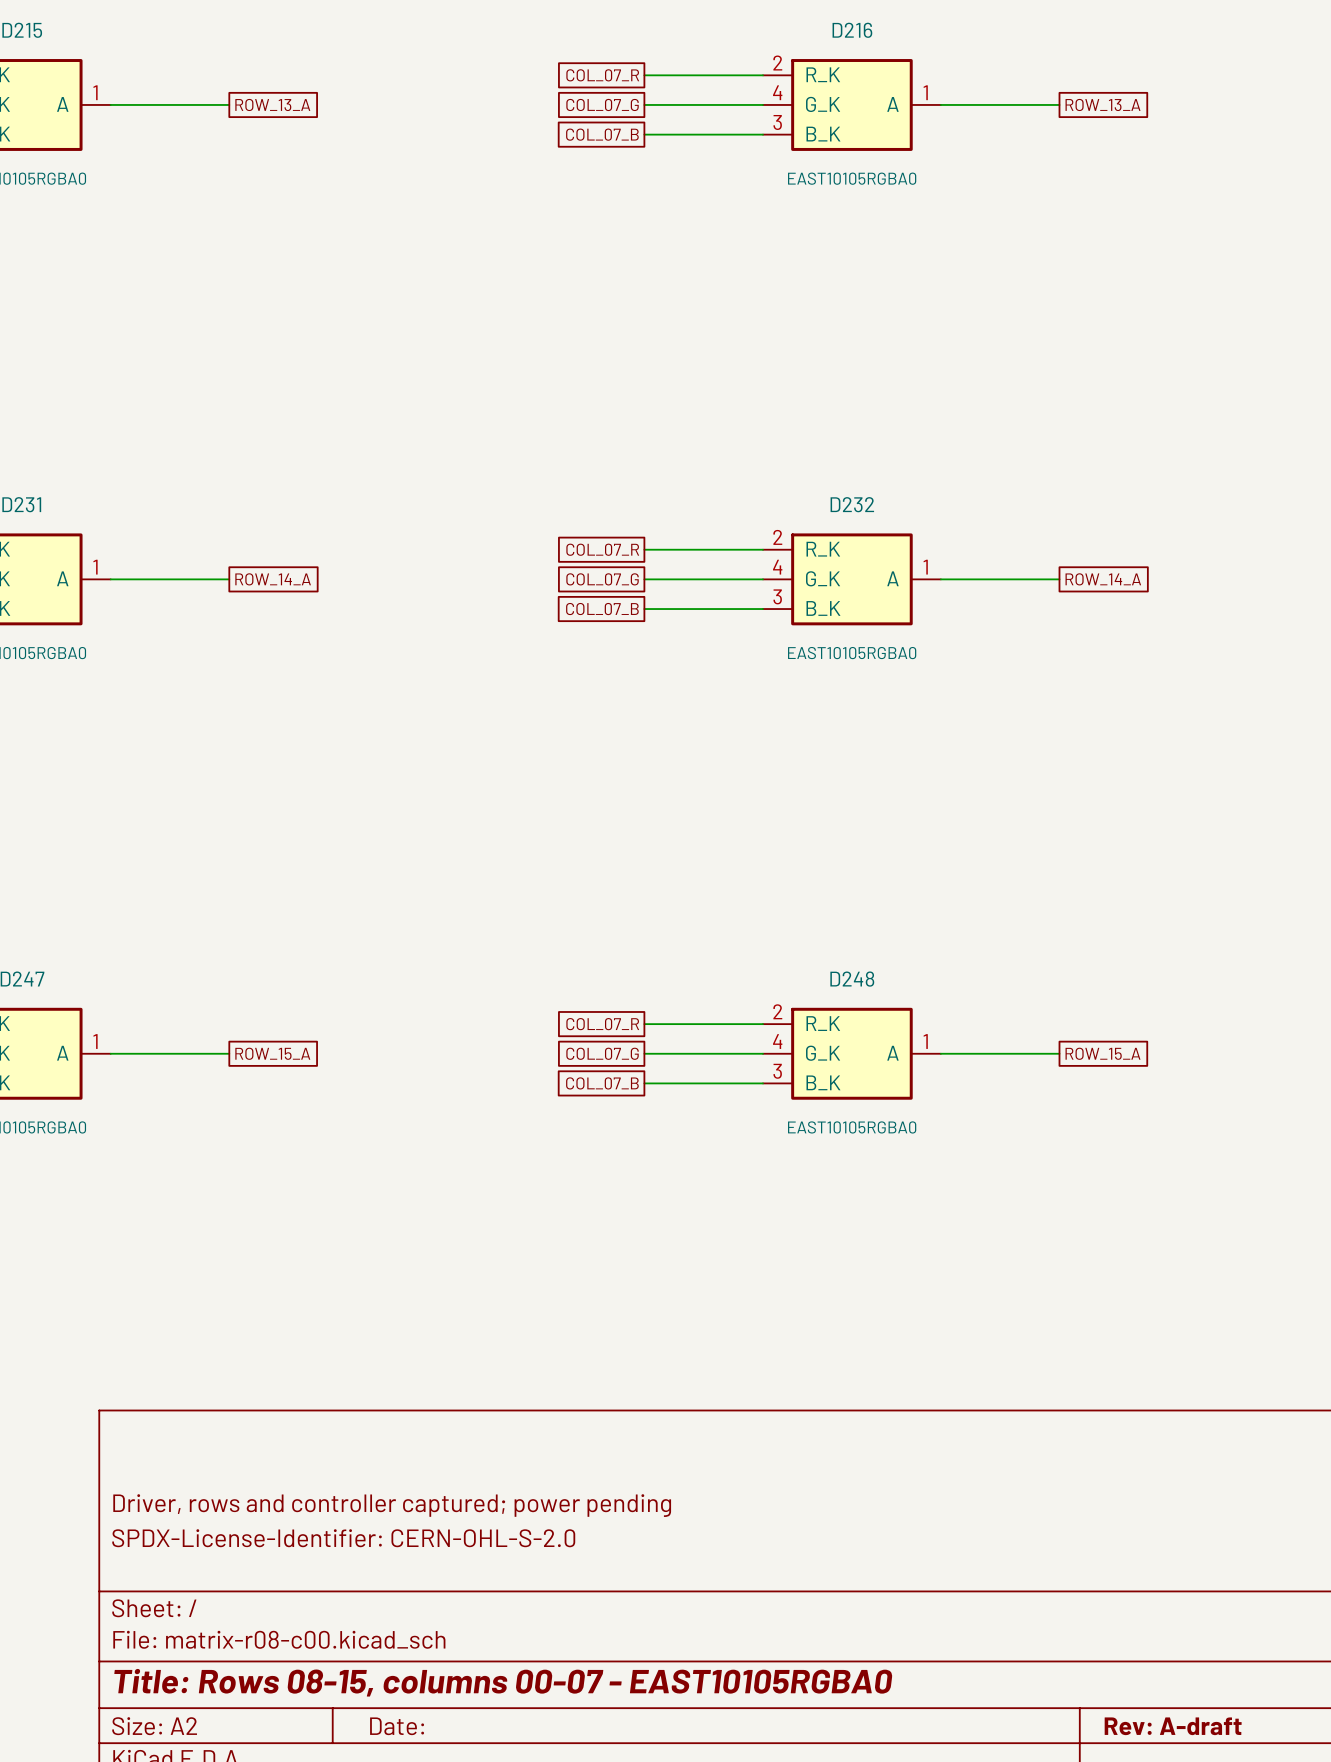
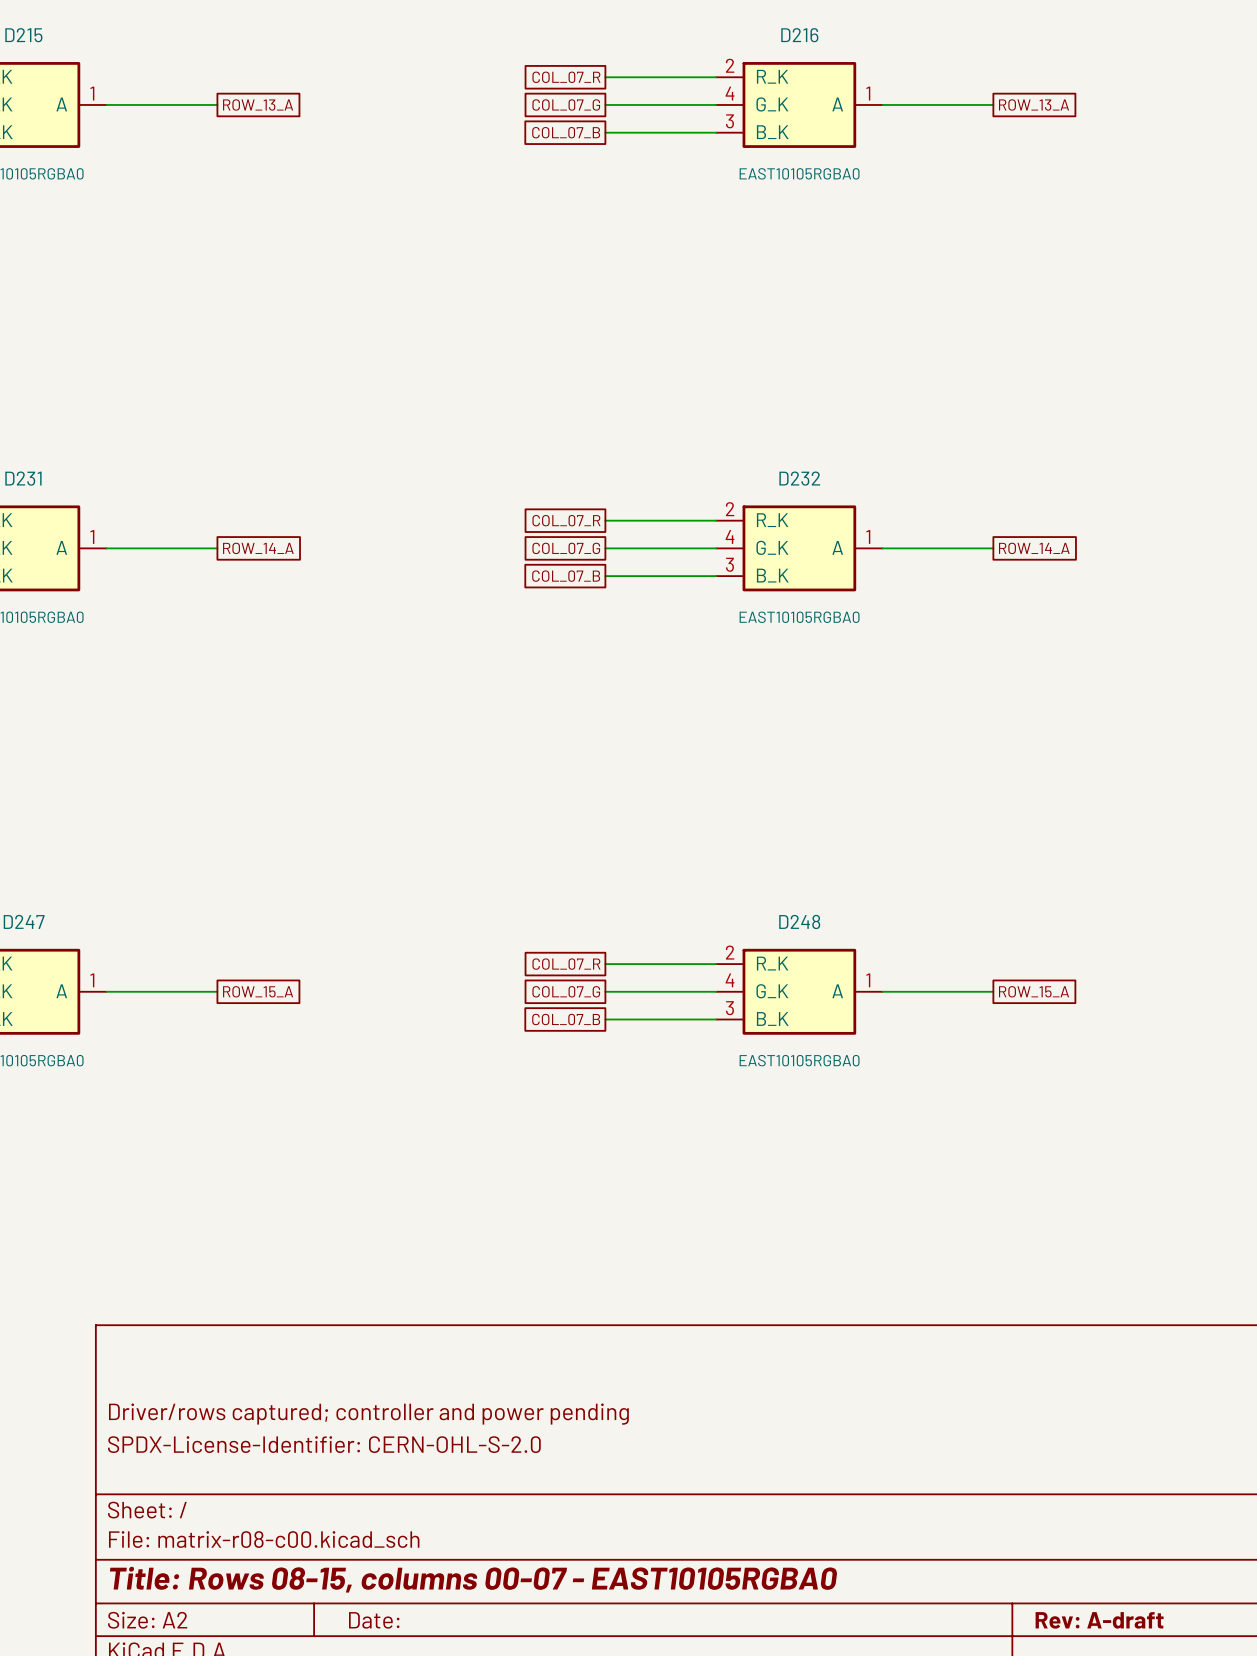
title block: Driver, rows and controller captured; power pending (392, 1505) -> Driver/rows captured; controller and power pending (368, 1414)

